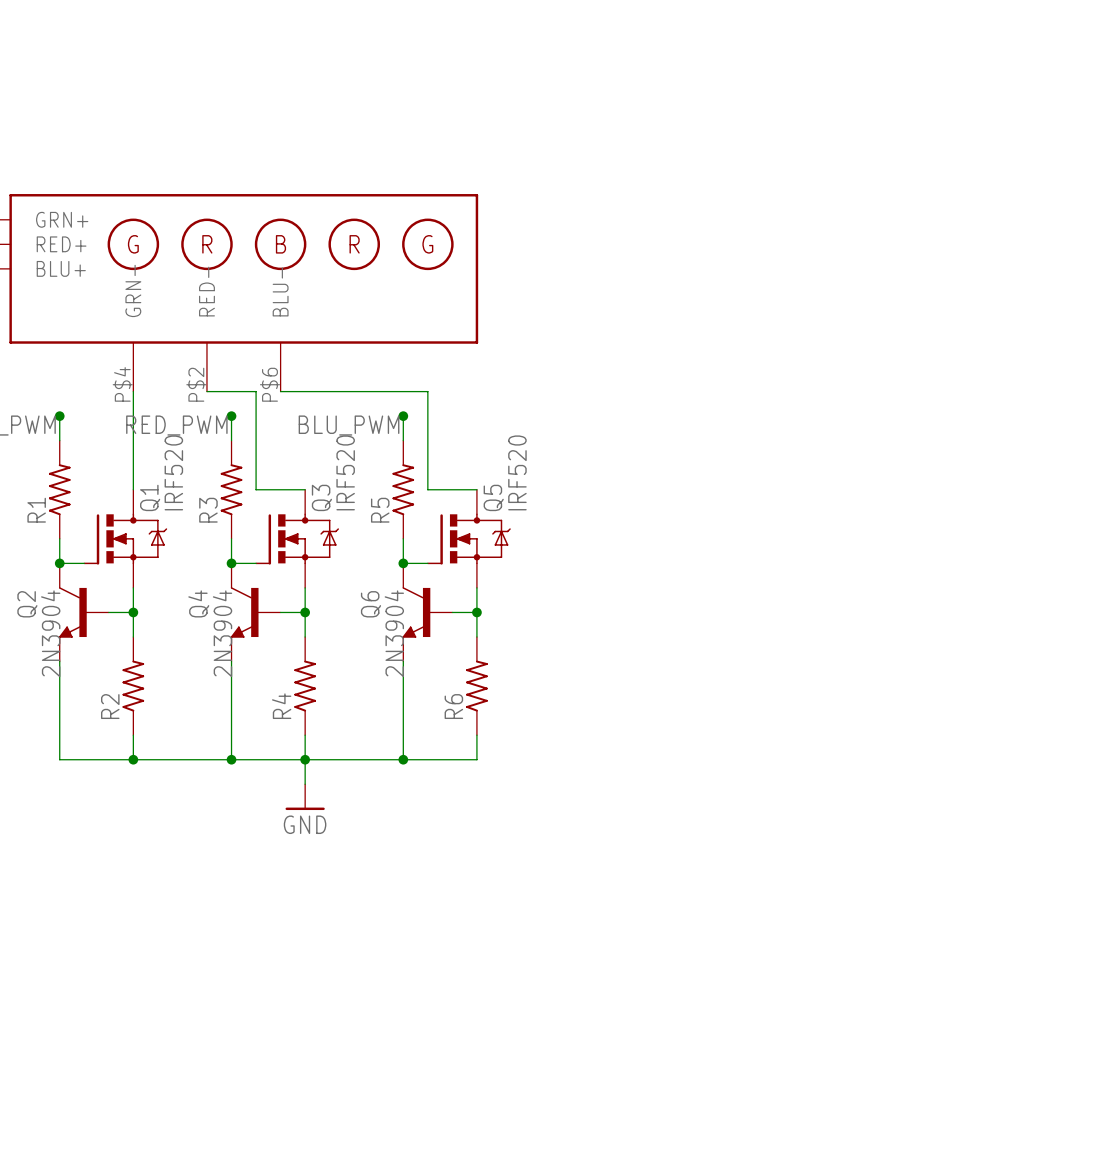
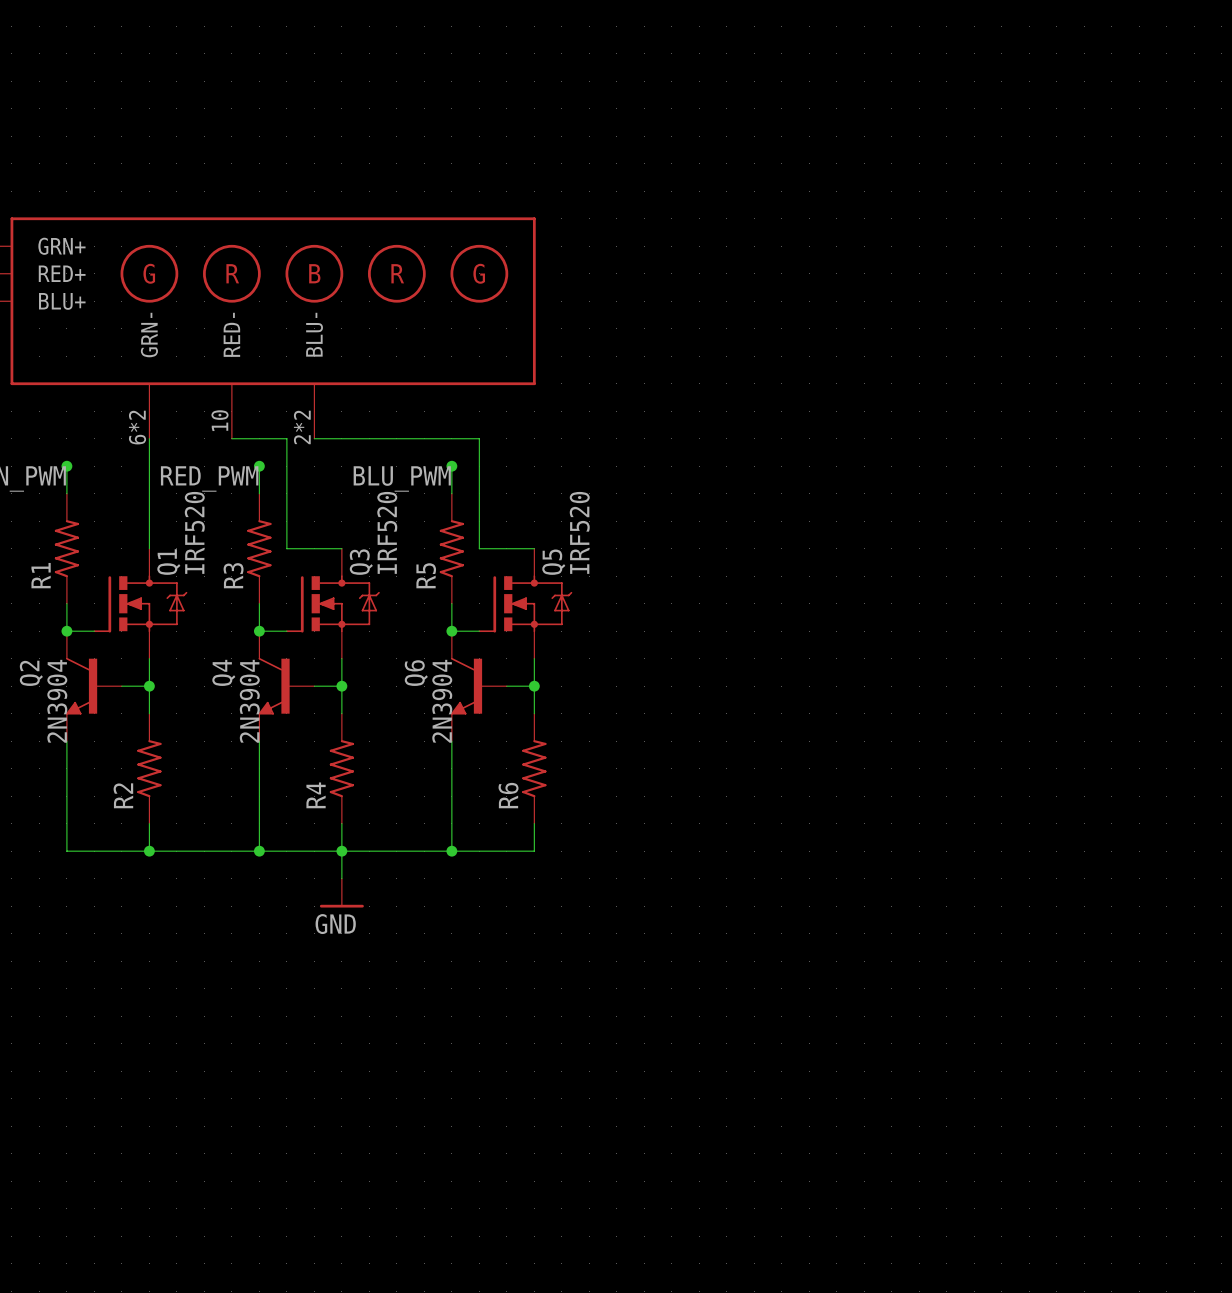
part pin number: P$4 (122, 384) -> 6*2 (137, 427)
part pin number: P$2 (196, 384) -> 10 (220, 420)
part pin number: P$6 (269, 384) -> 2*2 (302, 427)

